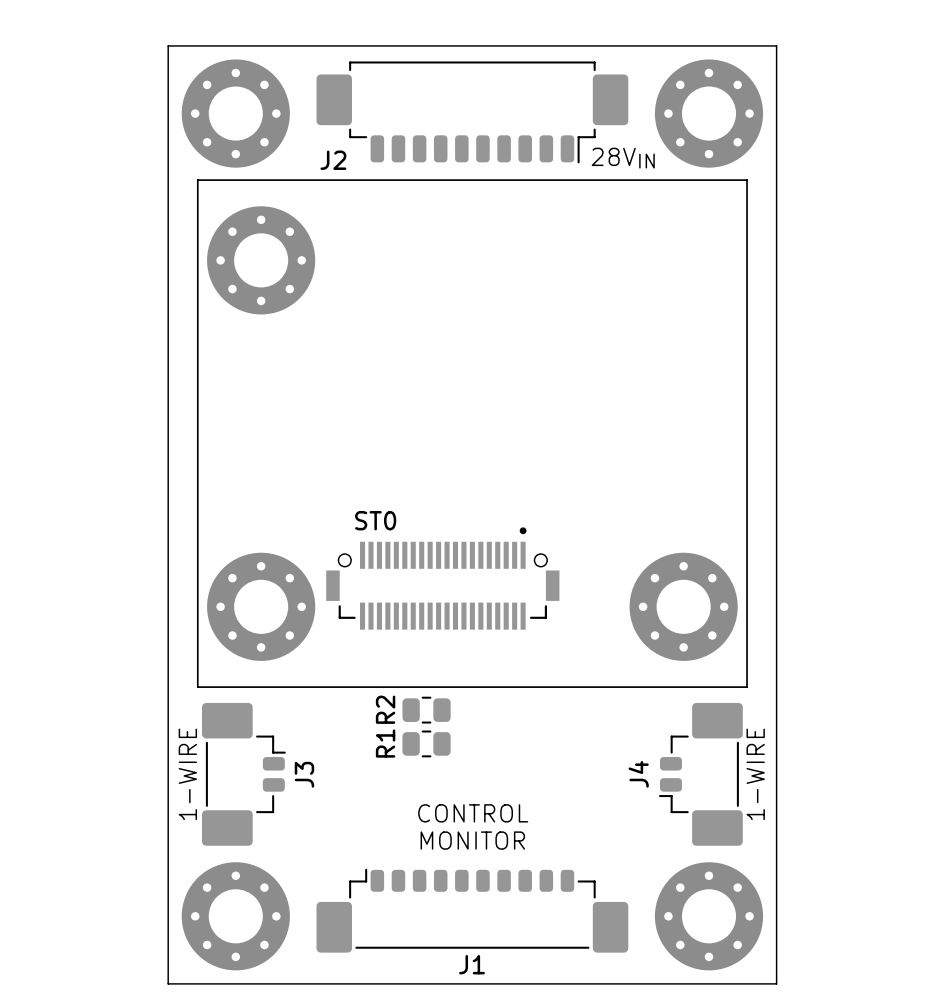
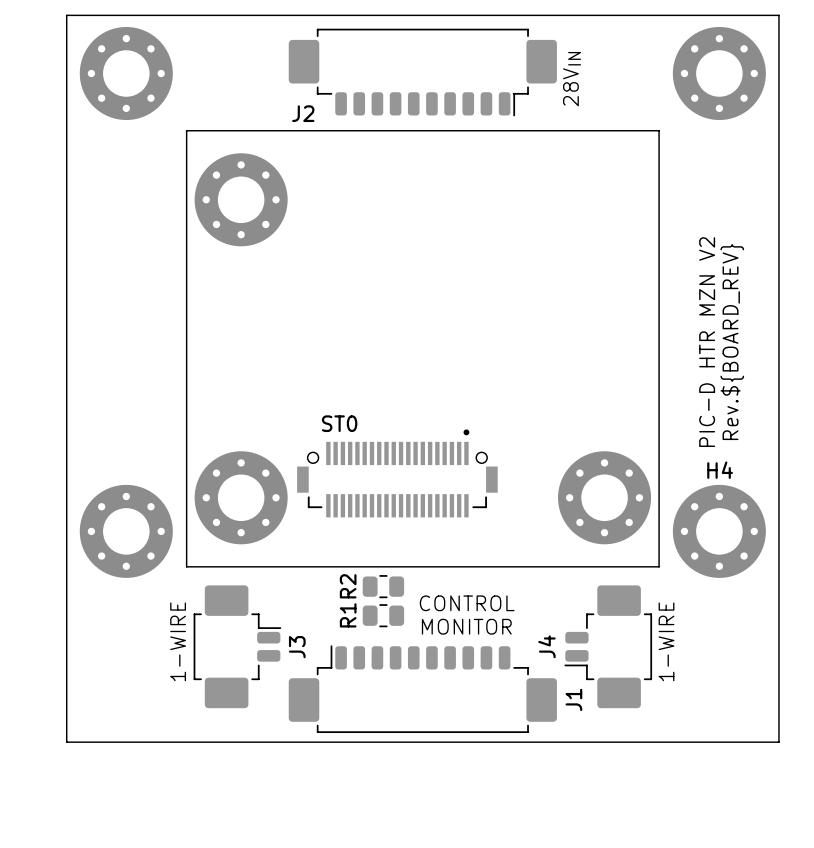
board edge: (168, 45) (168, 983) (776, 983) (776, 45) -> (161, 15) (66, 15) (66, 742) (778, 742) (778, 15) (684, 15)
part position: (235, 113) -> (126, 73)
part position: (708, 113) -> (719, 73)
text rotation: 0° (623, 158) -> 90° counterclockwise (572, 79)
text: none -> PIC-D HTR MZN V2 (707, 342)
text: none -> Rev.${BOARD_REV} (732, 342)
part: none -> (126, 531)
H4: none -> (719, 531)
J3 footprint: [202, 702, 286, 846] -> [193, 585, 282, 709]
J4 footprint: [658, 702, 743, 846] -> [564, 585, 653, 709]
text position: CONTROL (473, 813) -> CONTROL (467, 603)
text position: MONITOR (472, 840) -> MONITOR (466, 626)
J1 footprint: [316, 868, 629, 953] -> [288, 645, 557, 734]
part: (235, 916) -> none
part: (708, 916) -> none
J1 name position: J1 (471, 964) -> J1 (573, 699)

